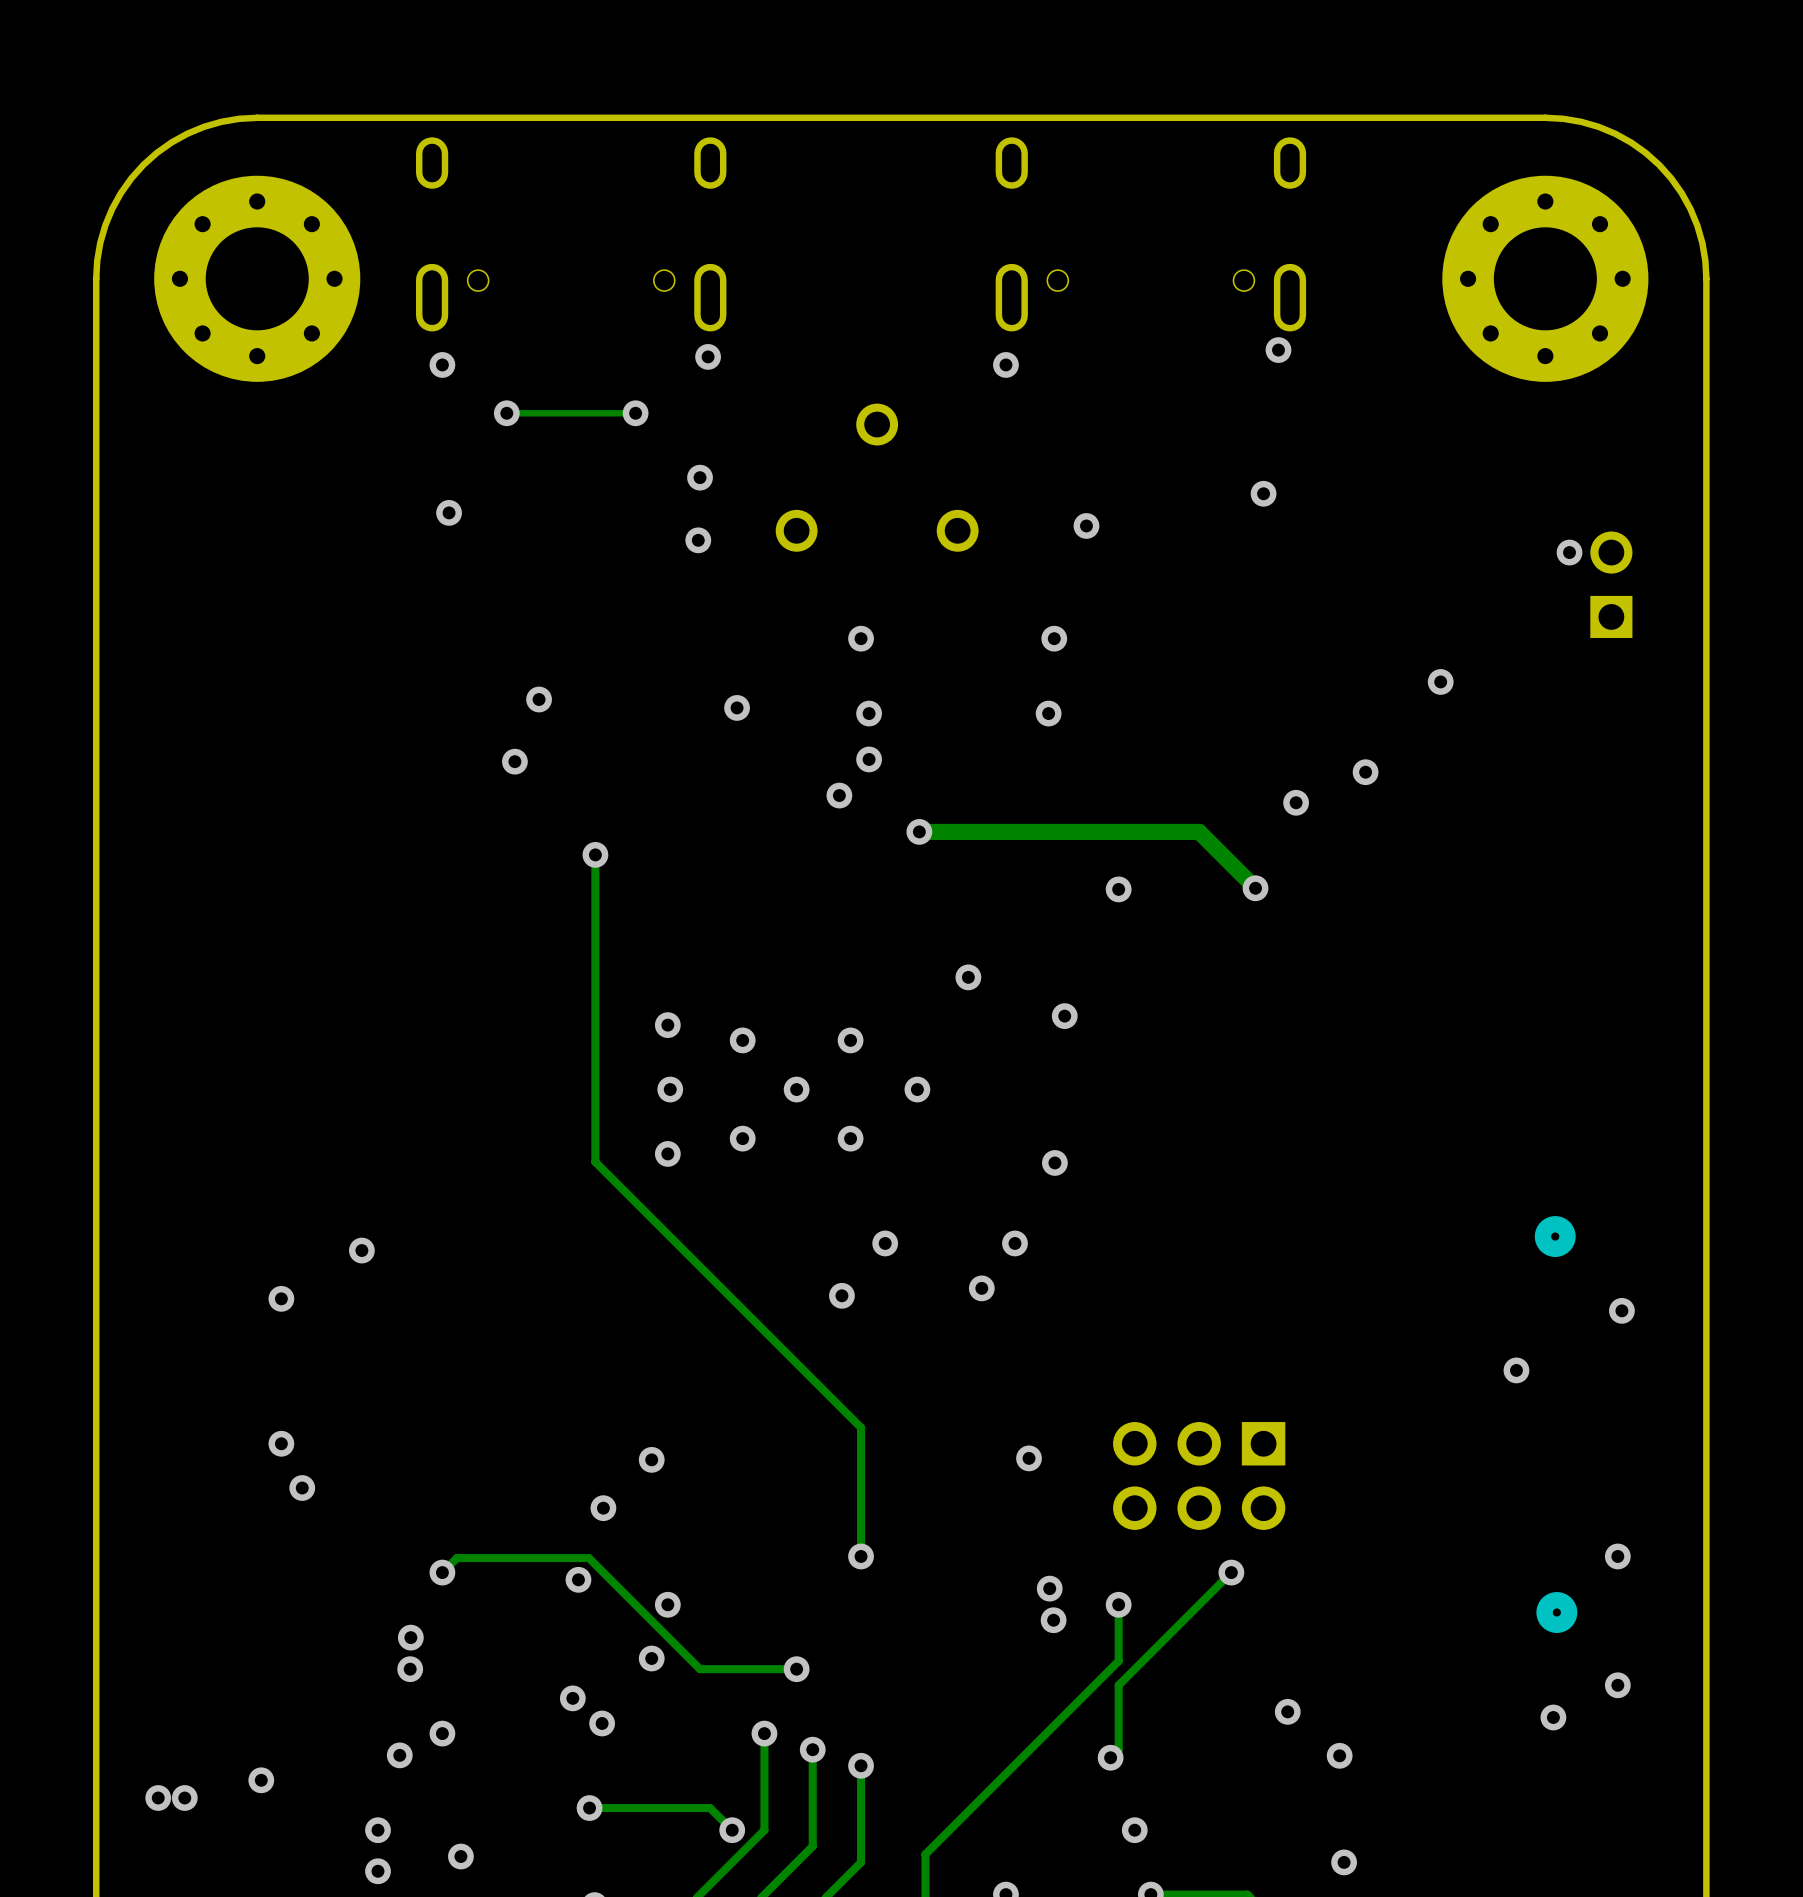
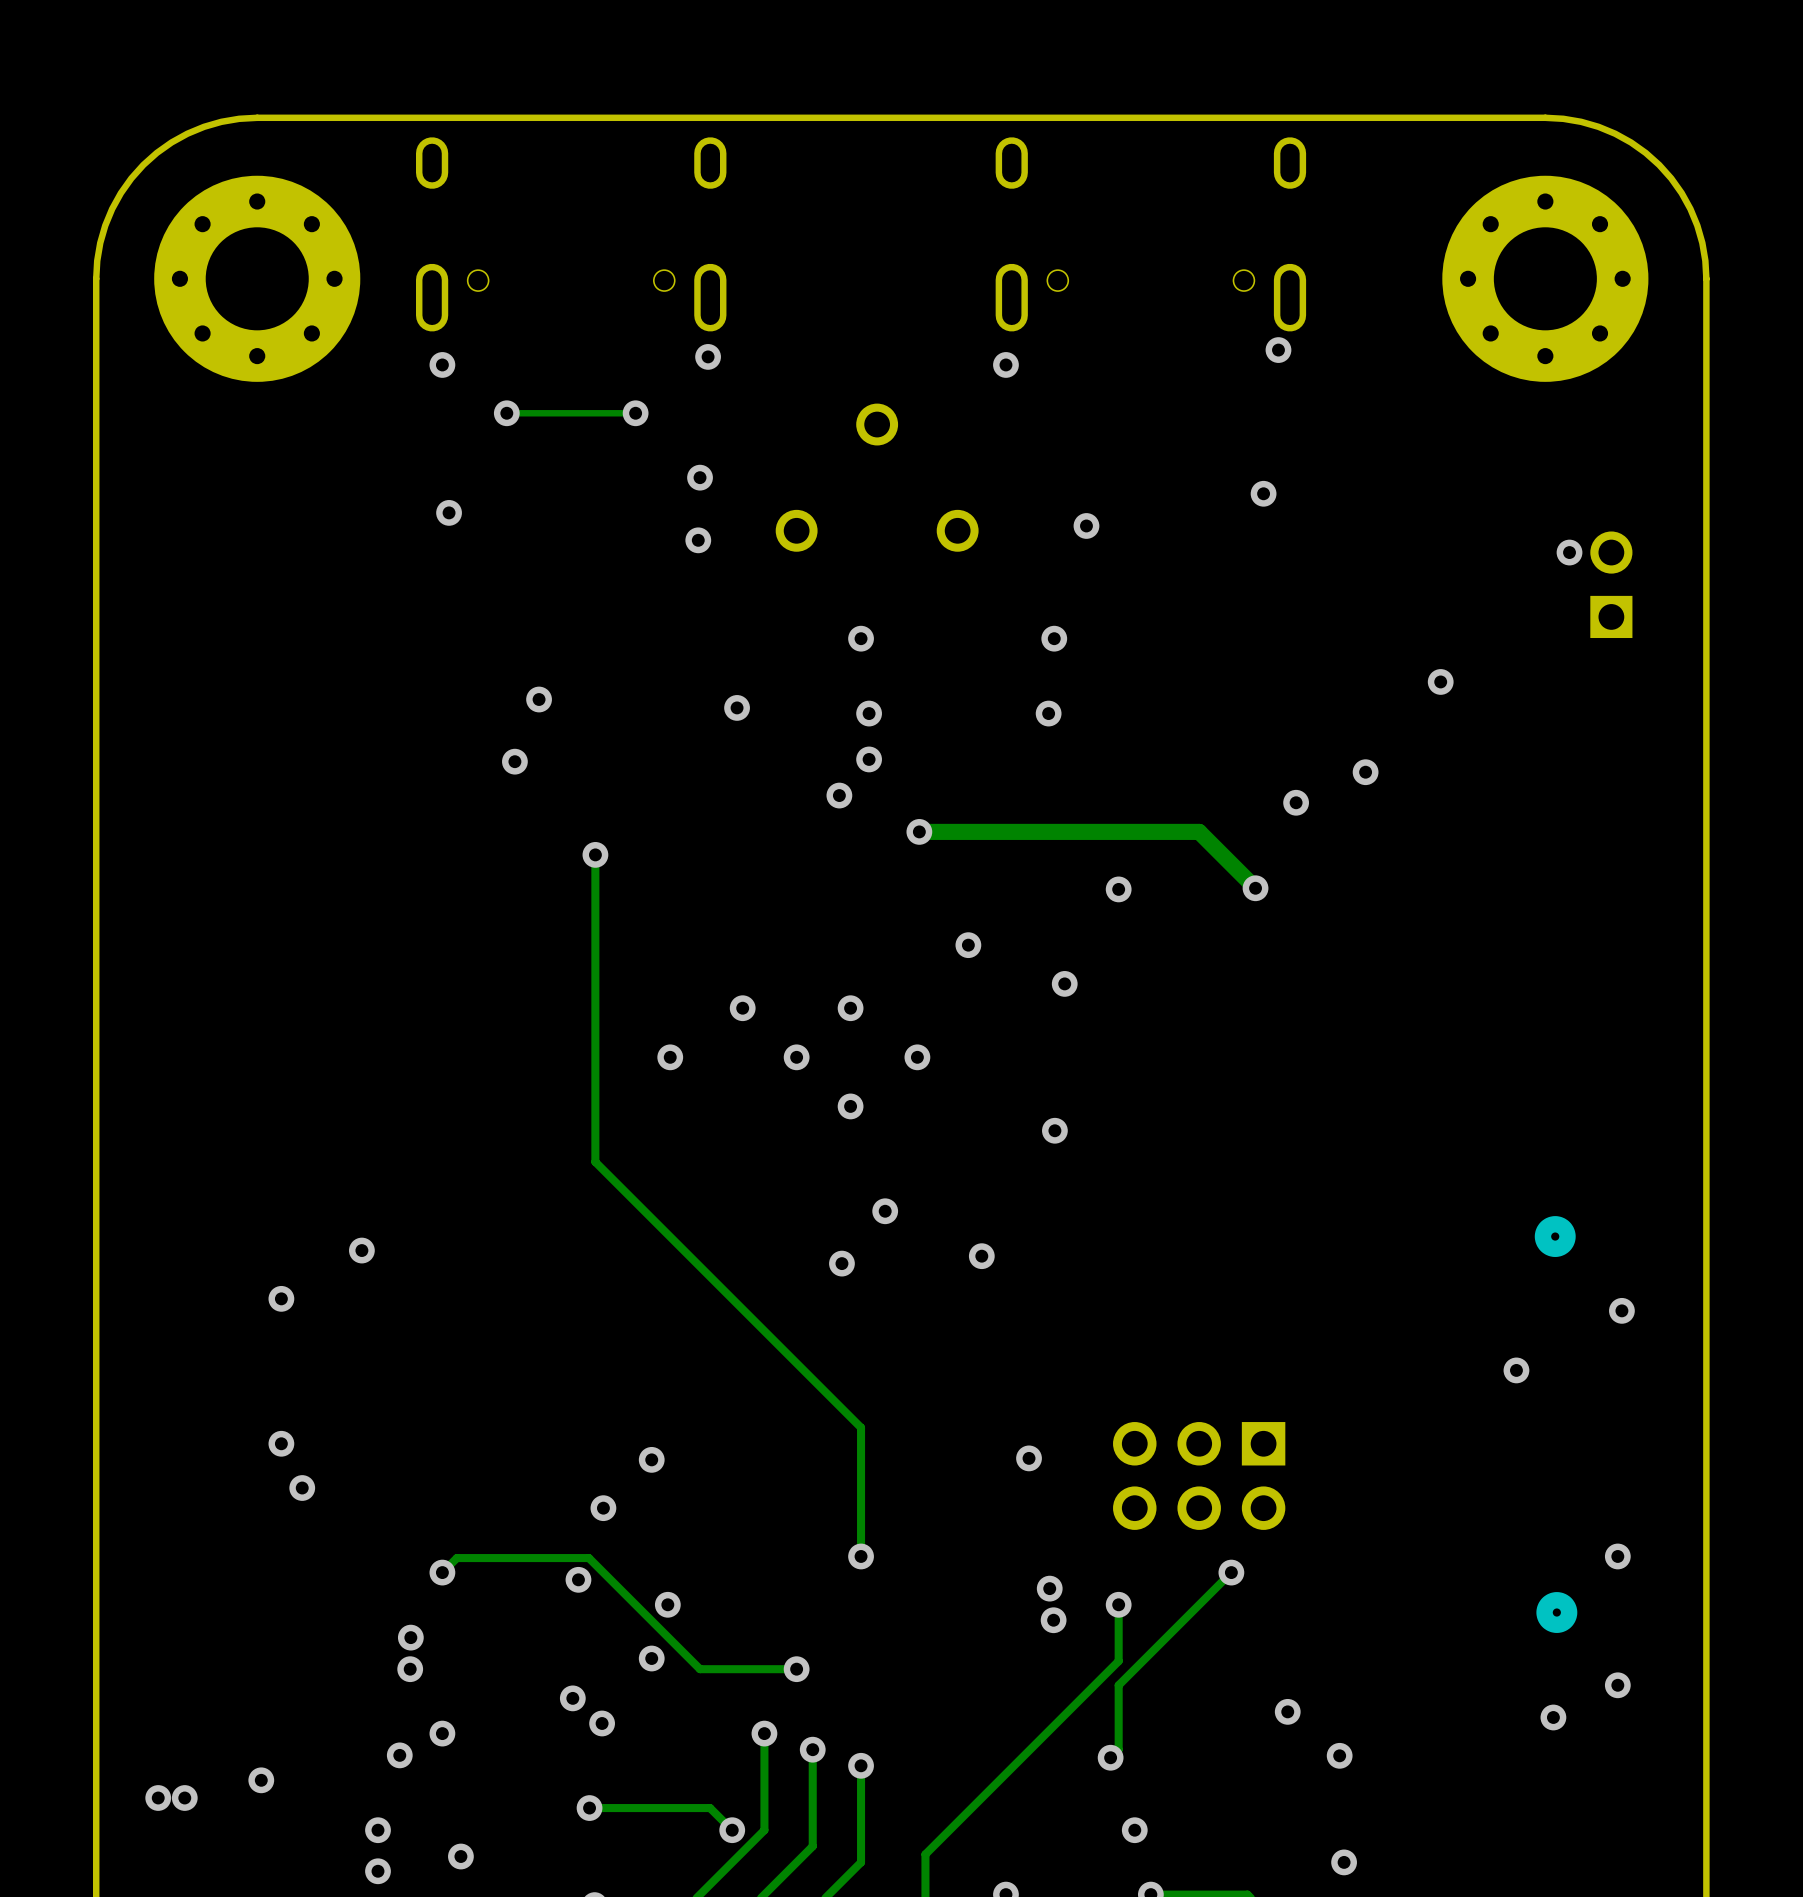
via position: (968, 977) -> (968, 945)
via: none -> (742, 1008)
via: none -> (850, 1008)
via position: (1064, 1016) -> (1064, 983)
via: (667, 1025) -> none
via: (742, 1040) -> none
via: (850, 1040) -> none
via: none -> (670, 1057)
via: none -> (796, 1057)
via: (670, 1089) -> none
via: (796, 1089) -> none
via position: (917, 1089) -> (917, 1057)
via: none -> (850, 1106)
via: (742, 1138) -> none
via: (850, 1138) -> none
via: (667, 1153) -> none
via position: (1054, 1162) -> (1054, 1130)
via: none -> (885, 1211)
via: (885, 1243) -> none
via: (1014, 1243) -> none
via: none -> (981, 1256)
via: none -> (841, 1263)
via: (981, 1288) -> none
via: (841, 1295) -> none

